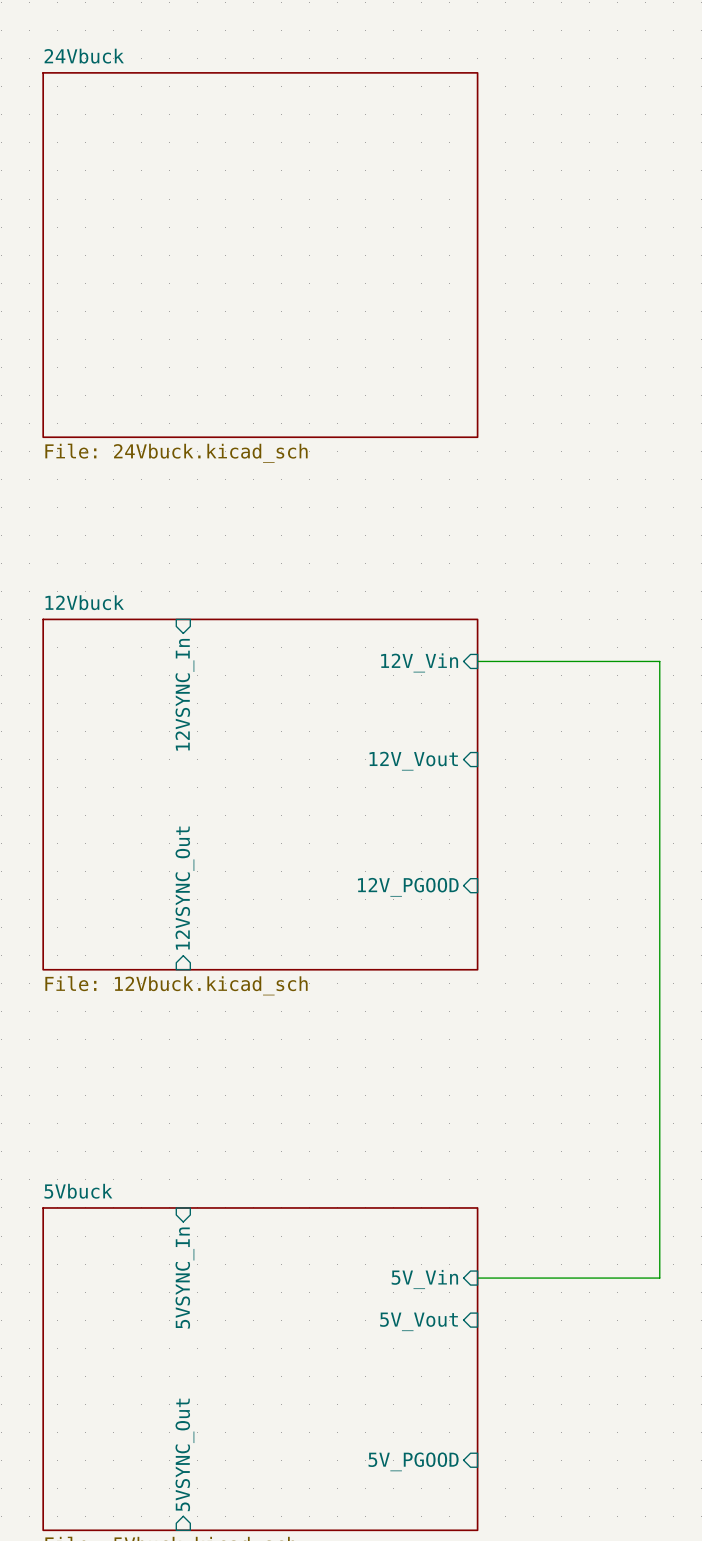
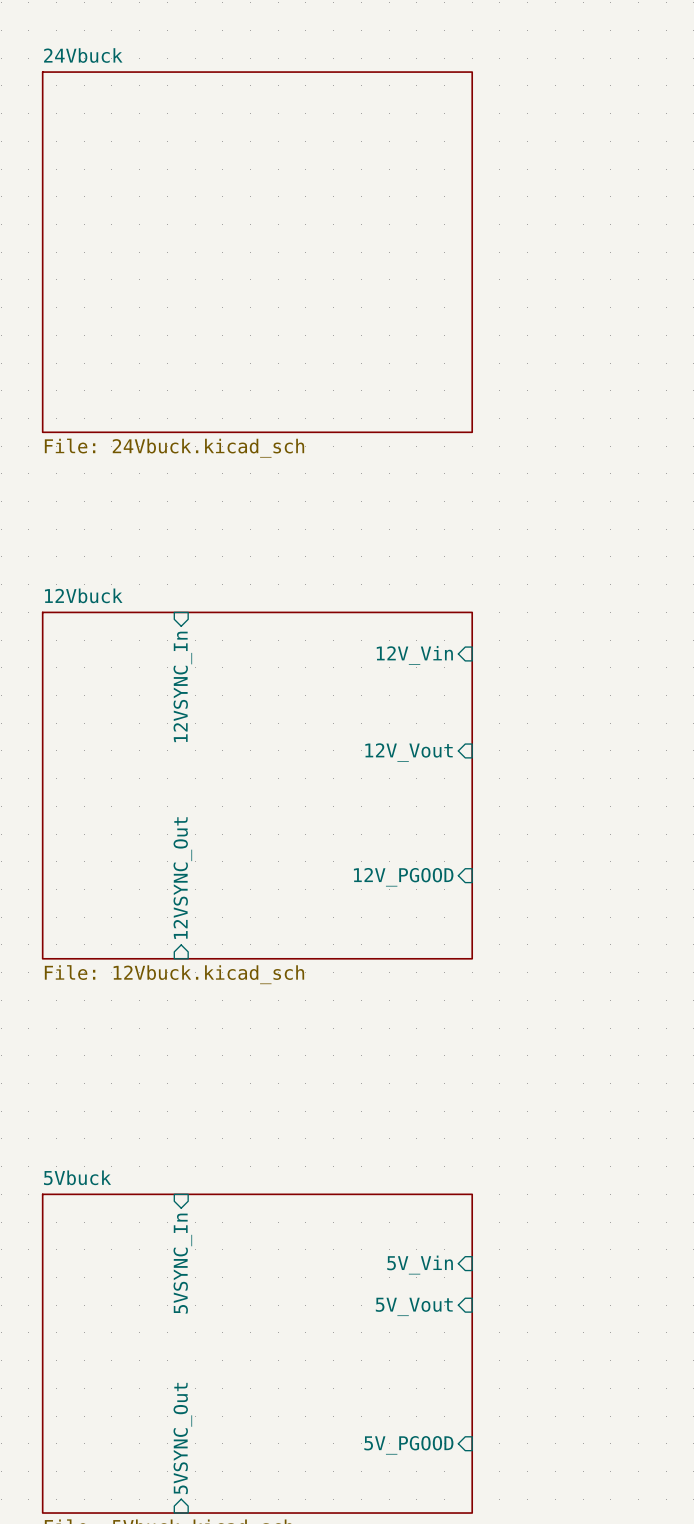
wire: (477, 661) (659, 661) (659, 1278) (477, 1278) -> none

